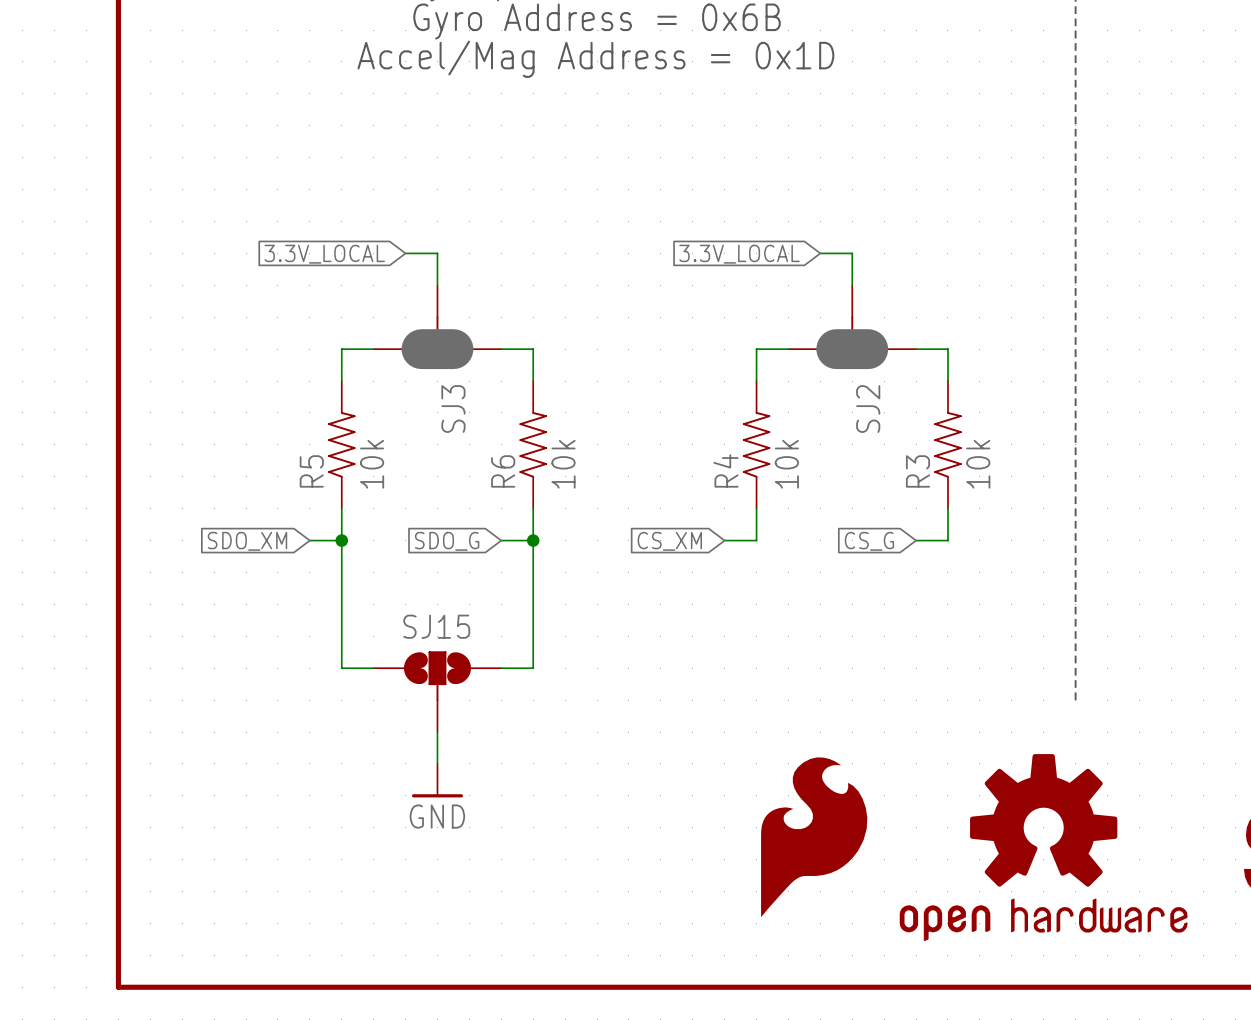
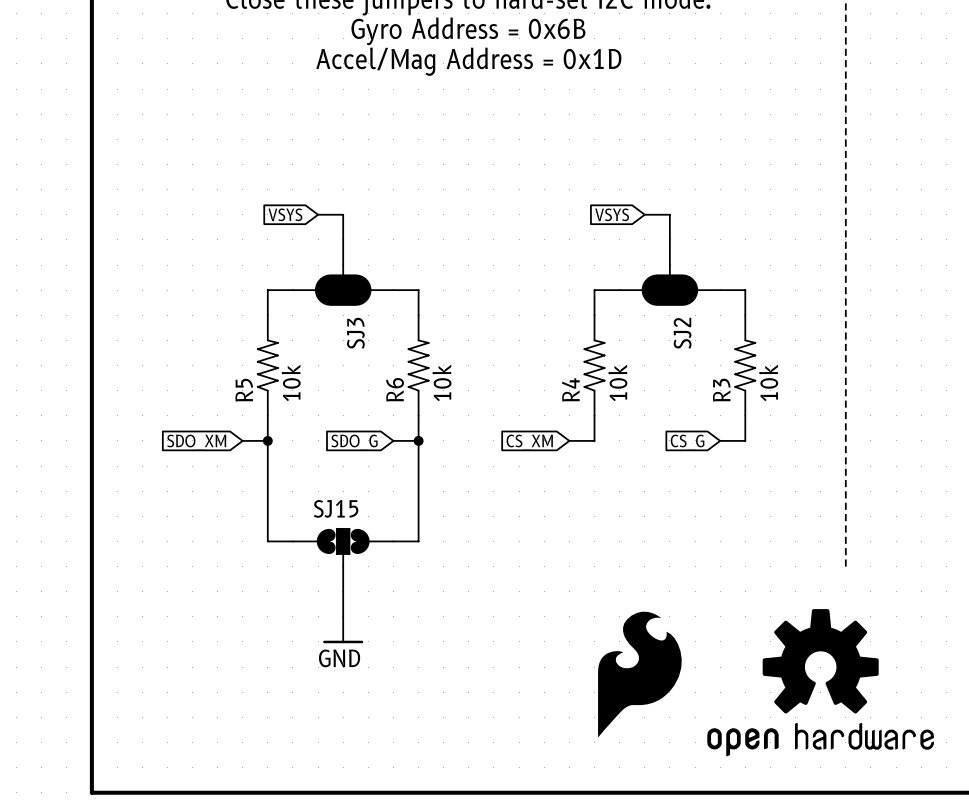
global label: 3.3V_LOCAL (324, 254) -> VSYS (285, 214)
global label: 3.3V_LOCAL (739, 254) -> VSYS (612, 214)

